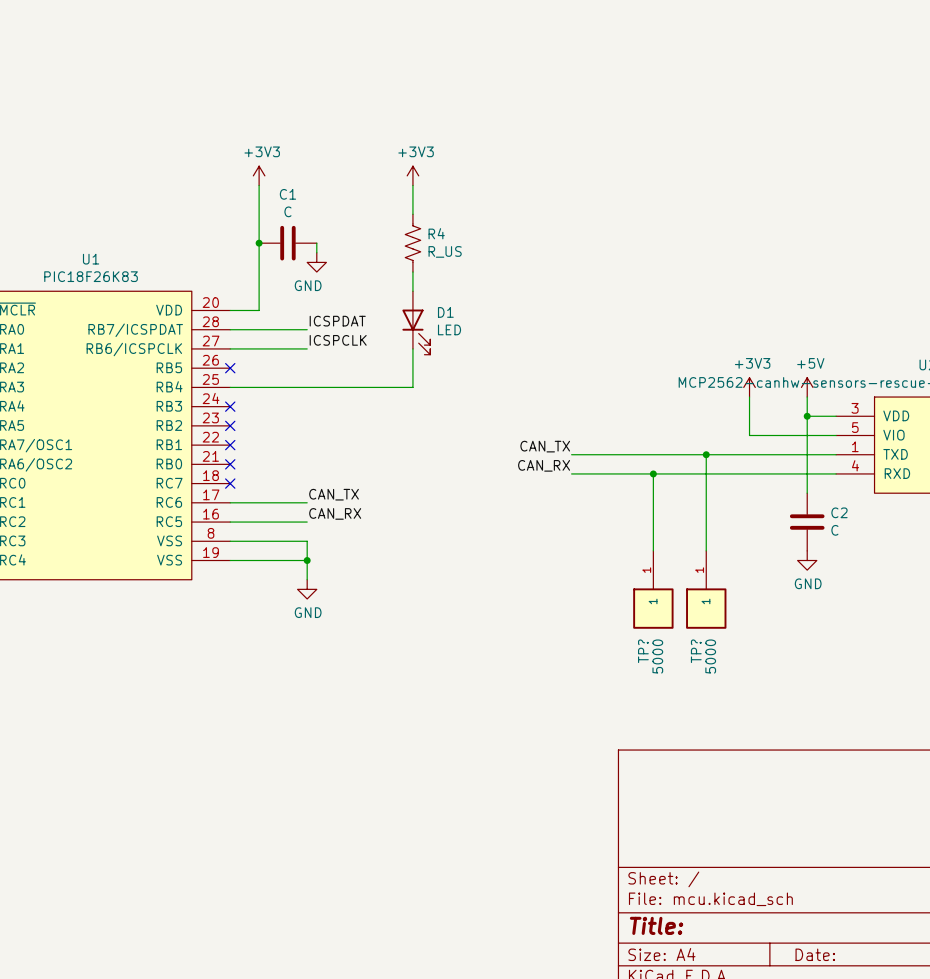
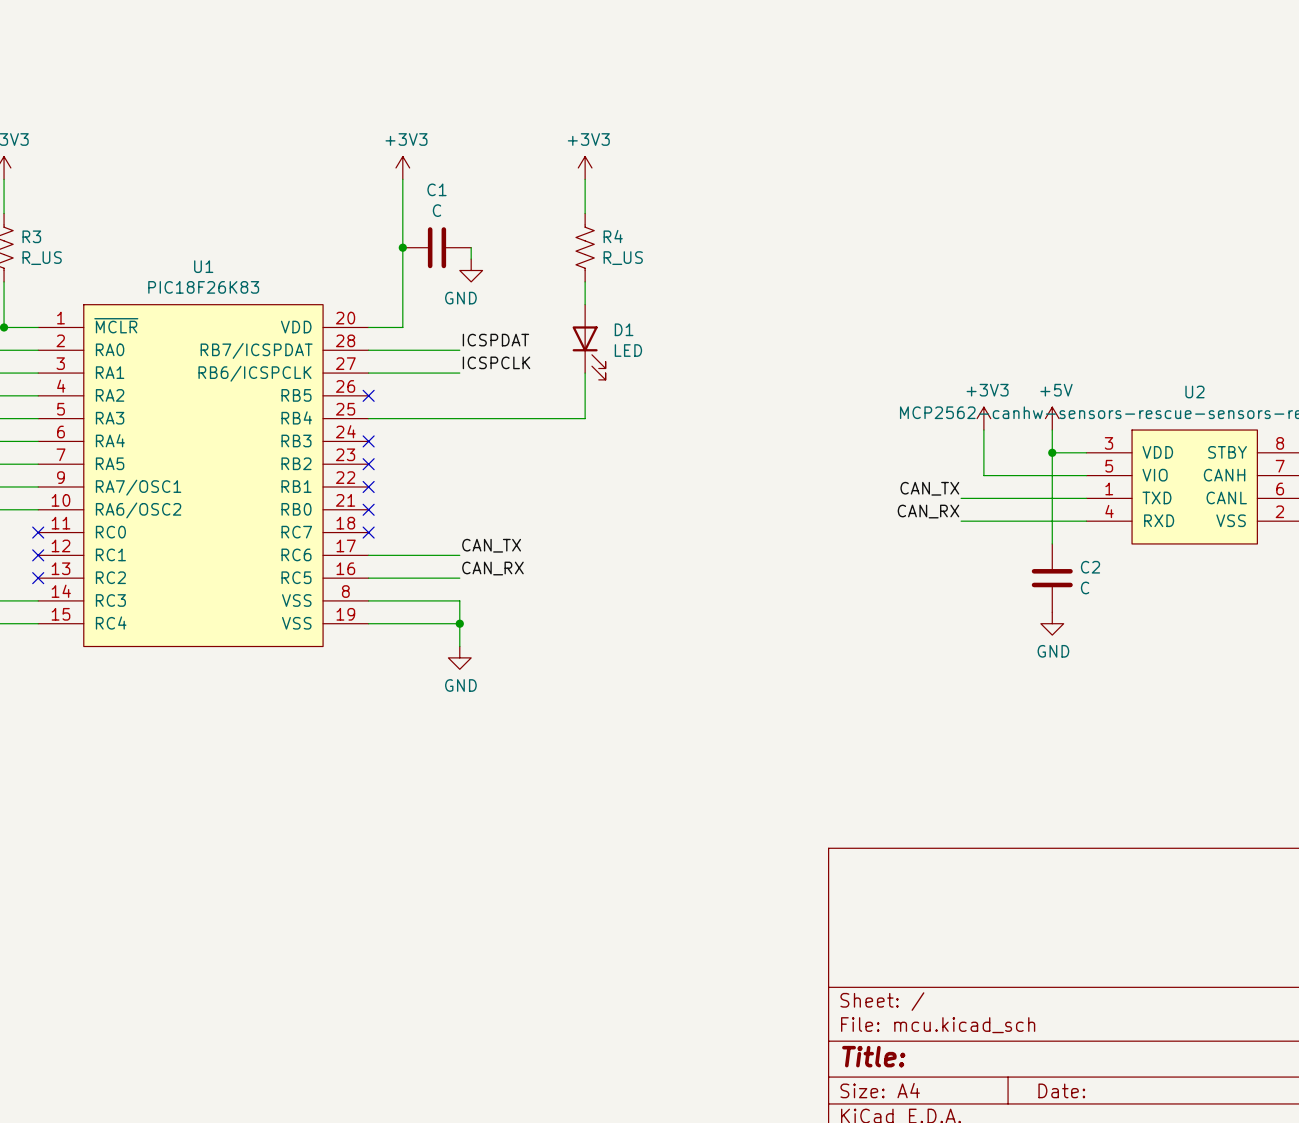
label position: CAN_TX (545, 446) -> CAN_TX (929, 488)
wire: (571, 454) (730, 454) -> none
wire: (706, 454) (706, 550) -> none
junction: (706, 454) -> none
label position: CAN_RX (544, 465) -> CAN_RX (928, 511)
wire: (571, 473) (730, 473) -> none
wire: (653, 473) (653, 550) -> none
junction: (653, 473) -> none
TP?: 5000 (653, 589) -> none
TP?: 5000 (706, 589) -> none

